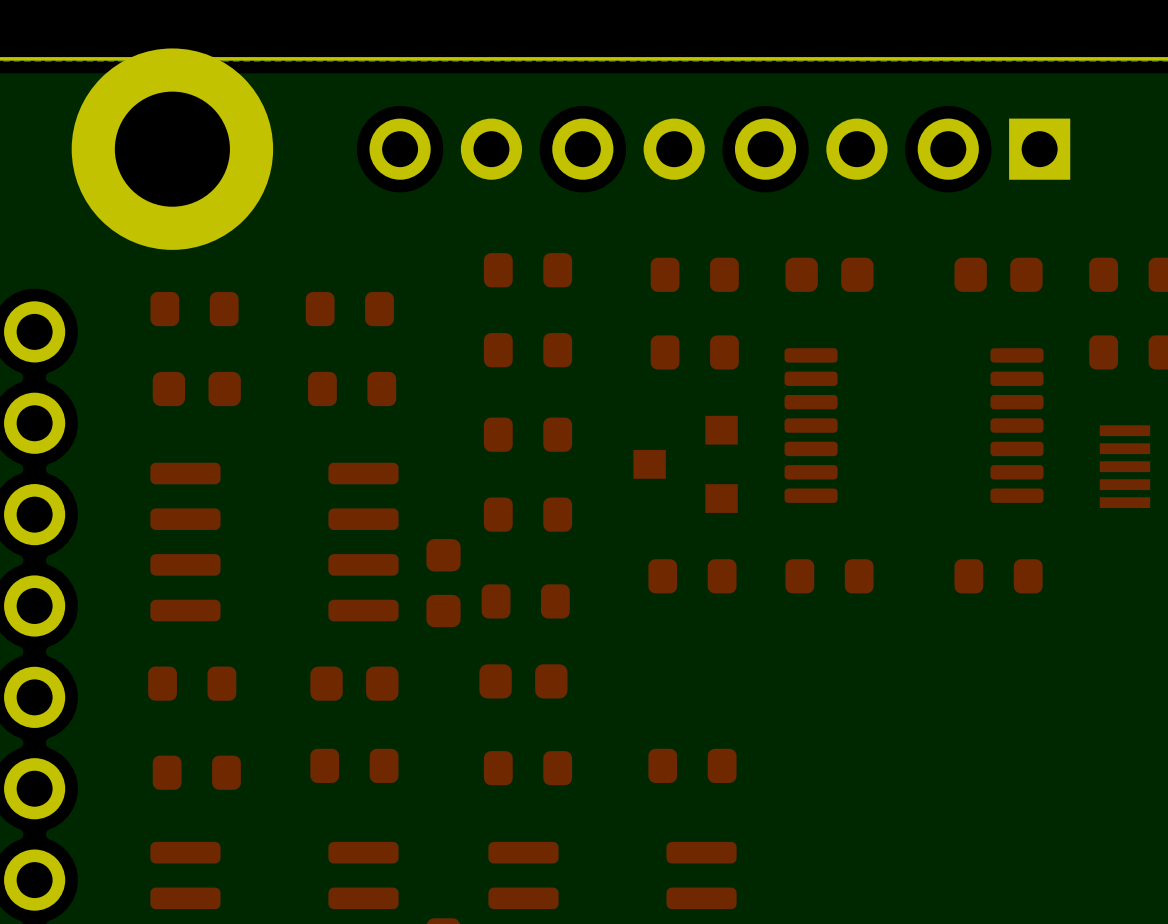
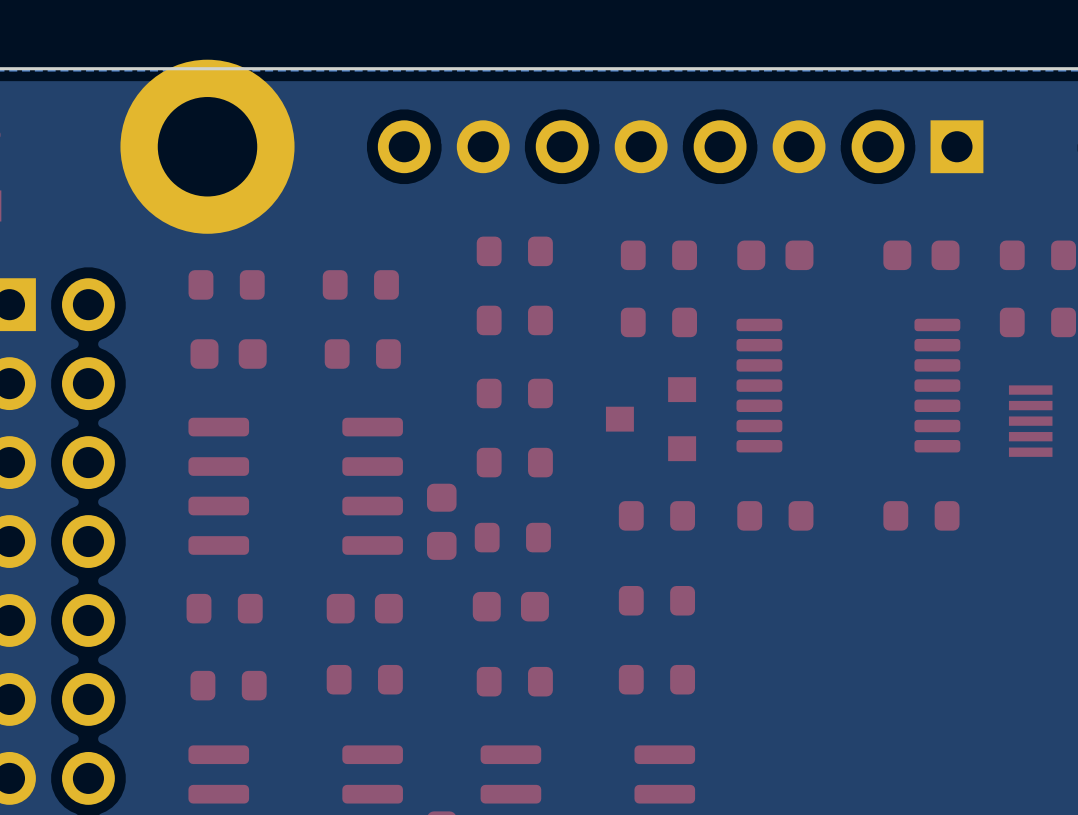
part: none -> (656, 600)

